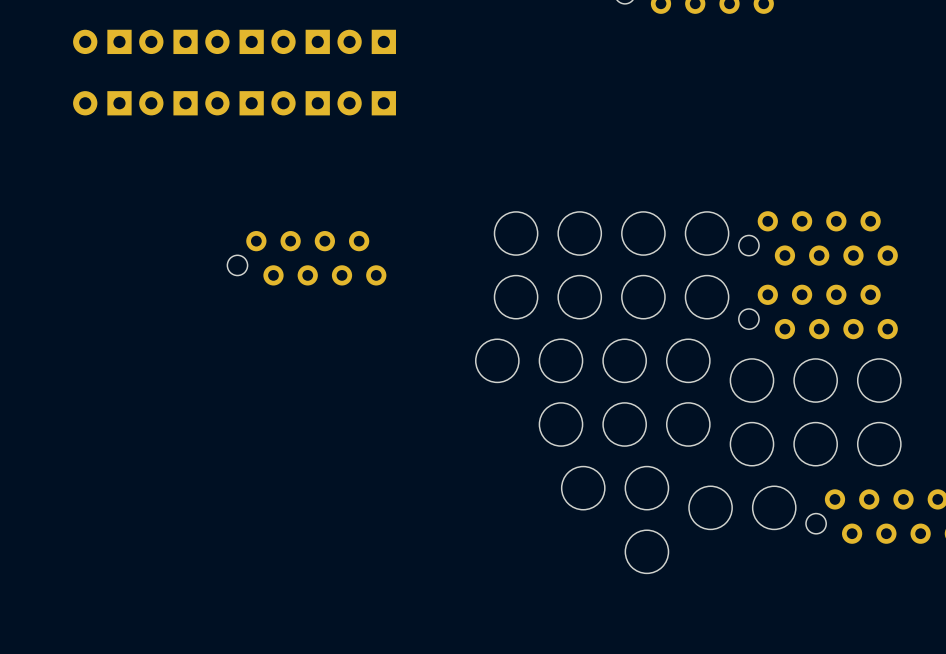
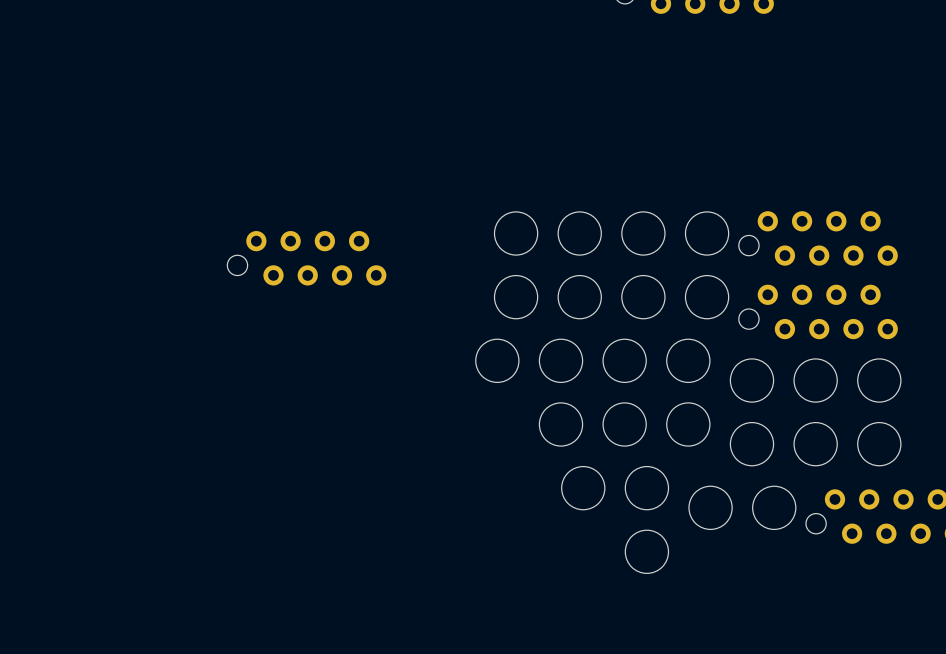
part: (102, 41) -> none
part: (168, 41) -> none
part: (234, 41) -> none
part: (300, 41) -> none
part: (366, 41) -> none
part: (102, 103) -> none
part: (168, 103) -> none
part: (234, 103) -> none
part: (300, 103) -> none
part: (366, 103) -> none

